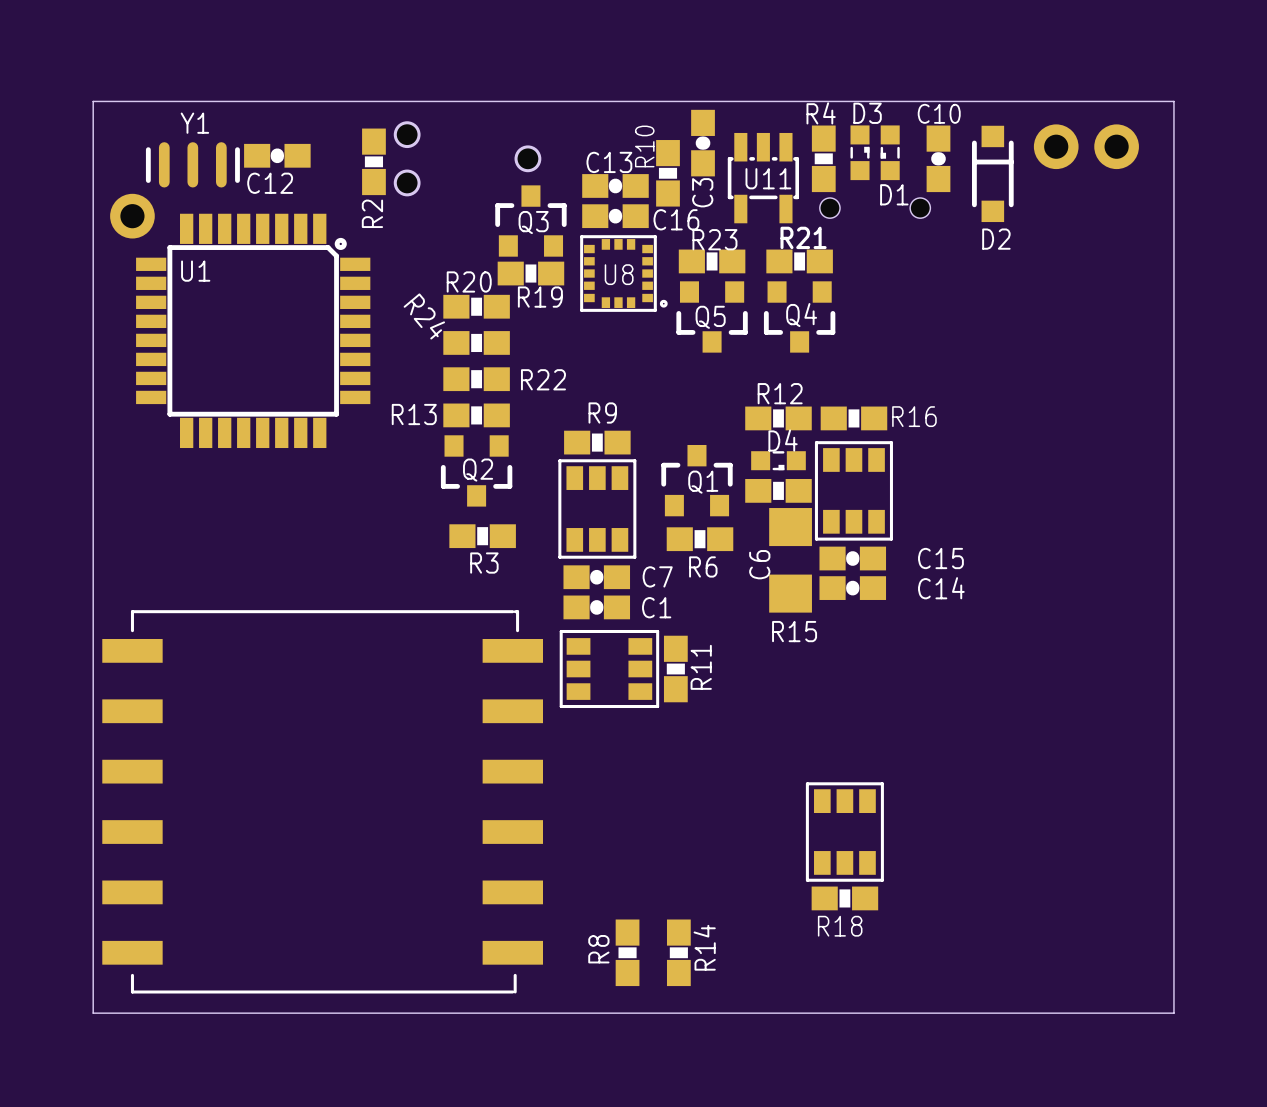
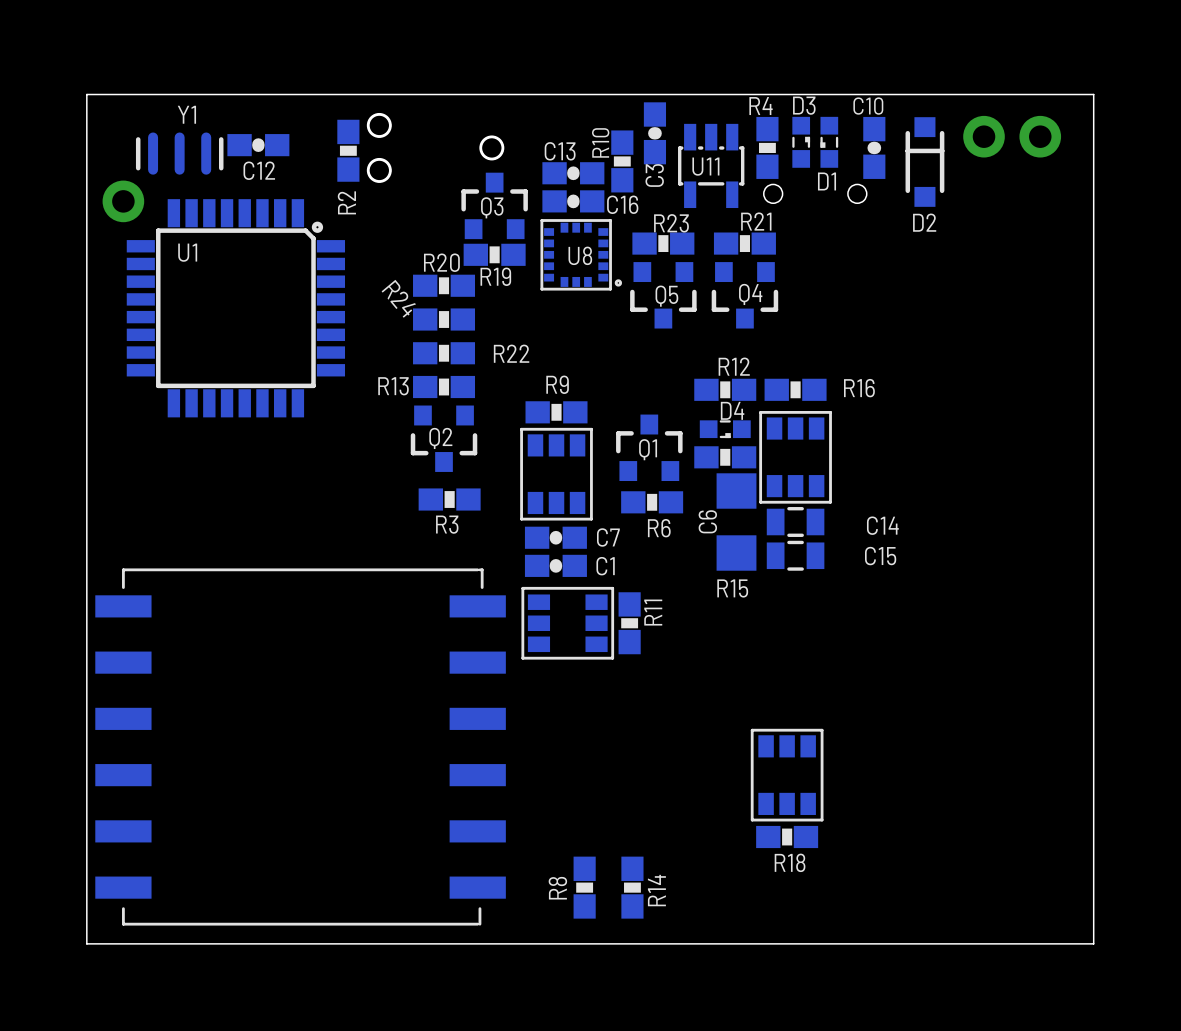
C15 footprint: [819, 546, 887, 571] -> [766, 540, 825, 571]
C14 footprint: [819, 576, 887, 600] -> [766, 507, 825, 537]

